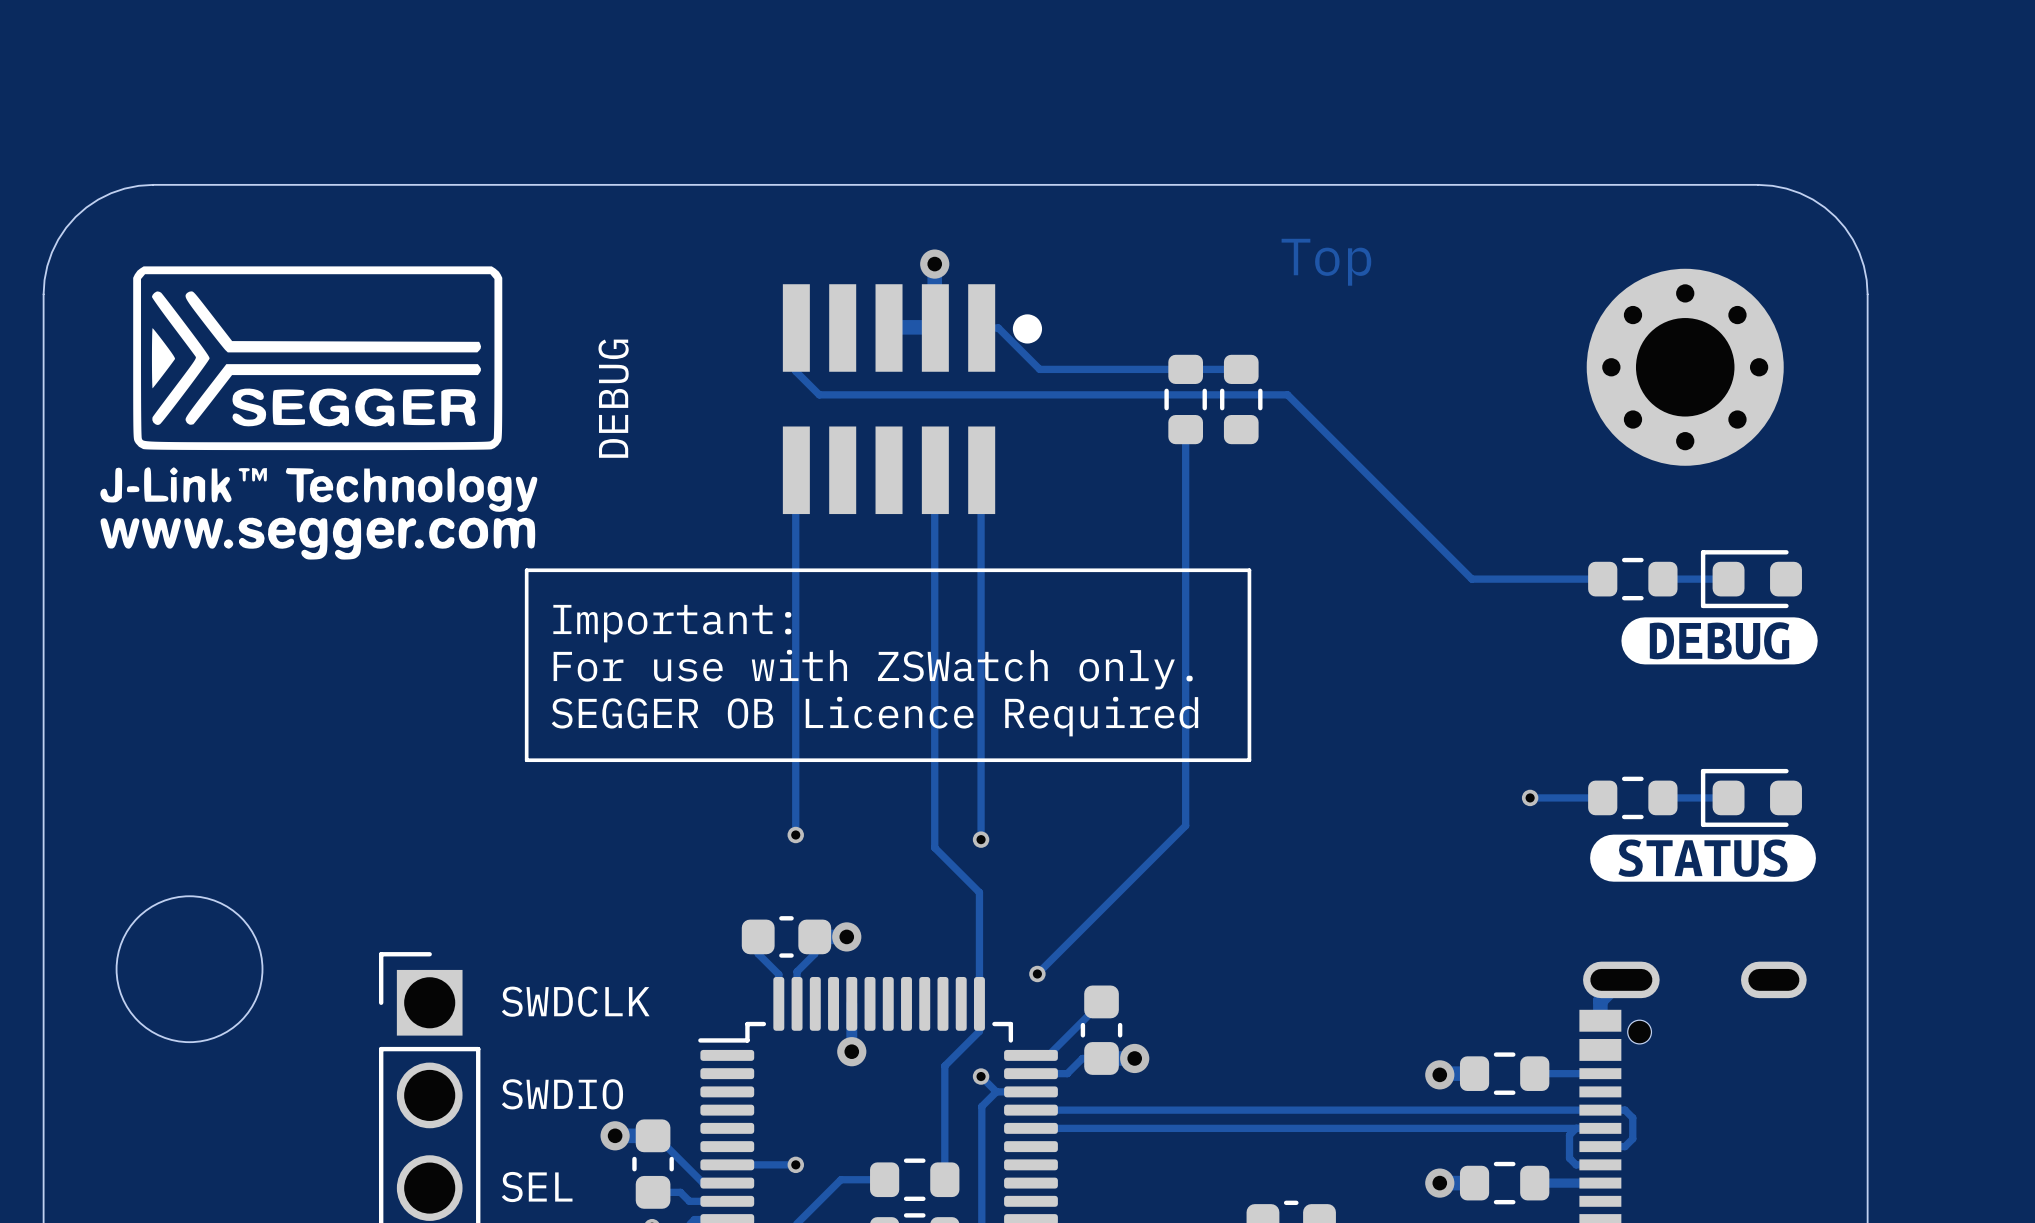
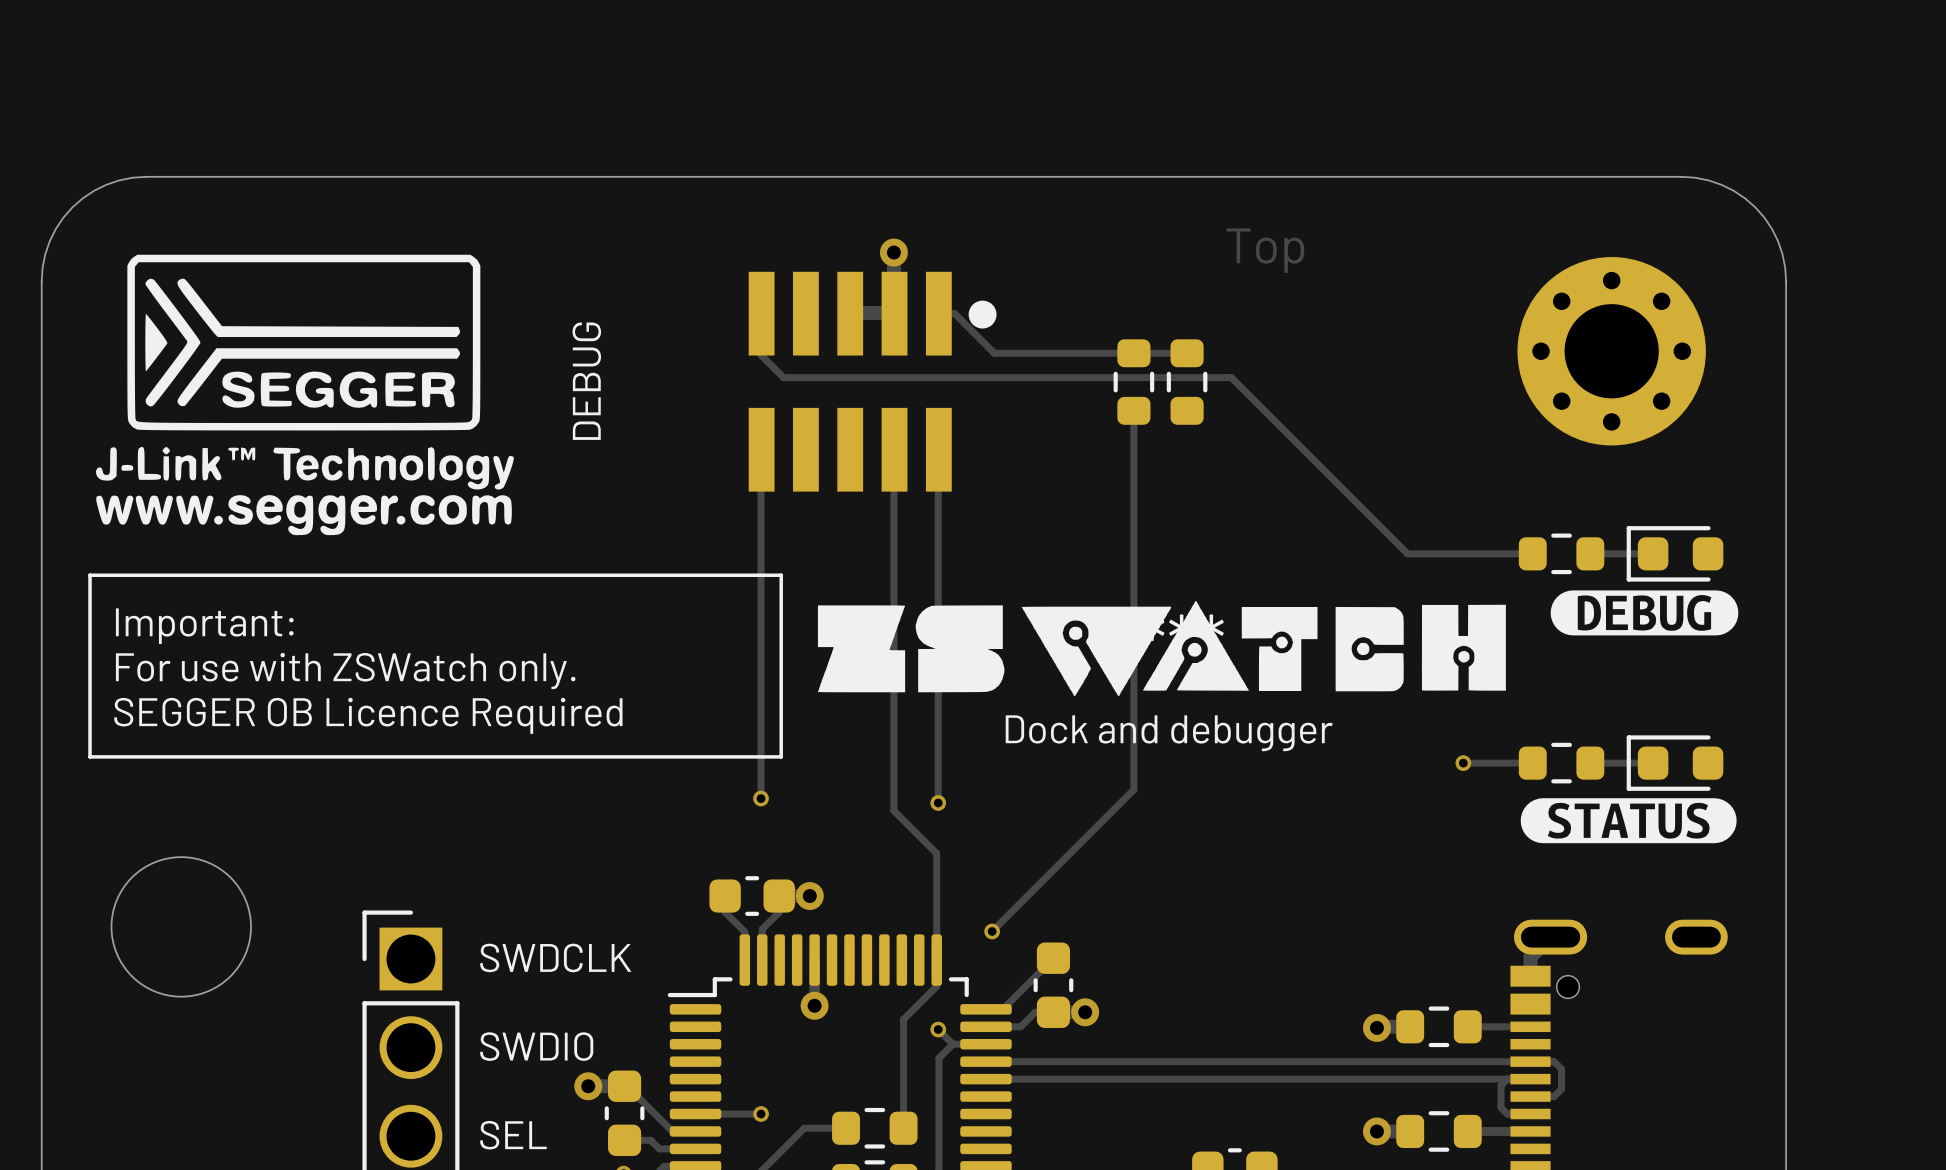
line: (526, 570) (1249, 570) (1249, 760) (526, 760) (526, 570) -> (90, 575) (781, 575) (781, 756) (90, 756) (90, 575)
text position: Important: (672, 623) -> Important: (204, 626)
text position: For use with ZSWatch only. (873, 669) -> For use with ZSWatch only. (345, 671)
part: none -> (1161, 648)
text position: SEGGER OB Licence Required (874, 716) -> SEGGER OB Licence Required (368, 715)
text: none -> Dock and debugger (1169, 733)

